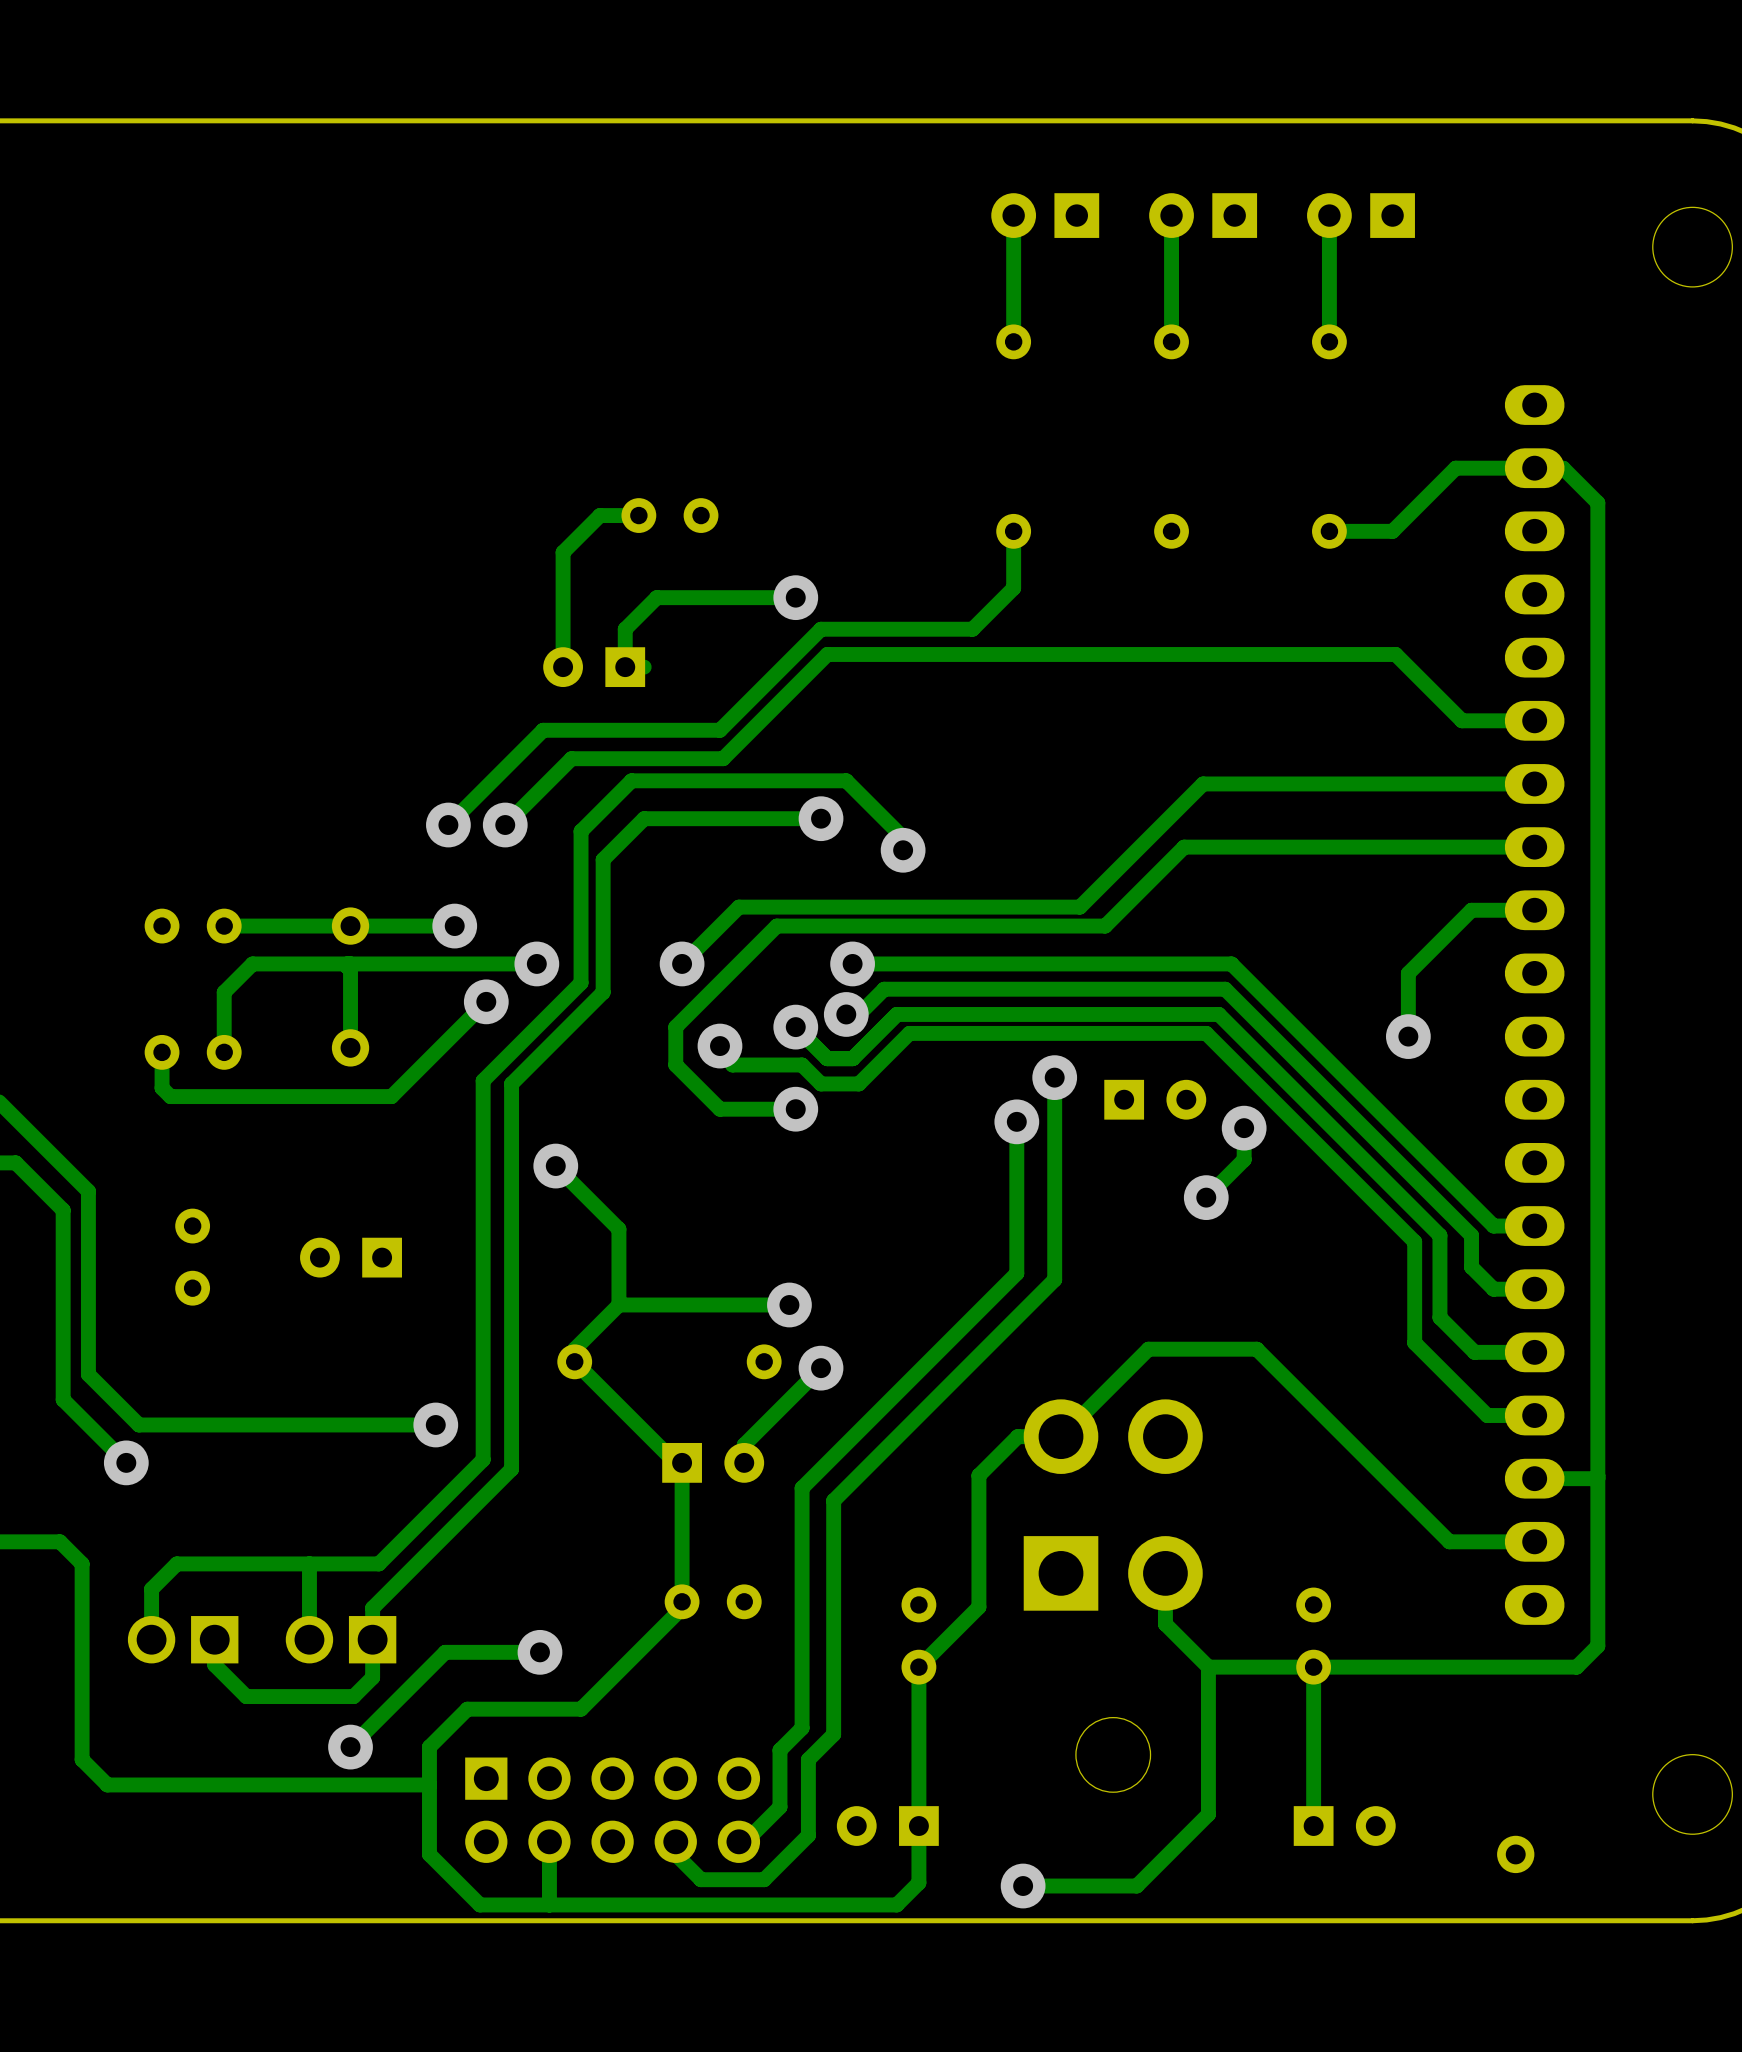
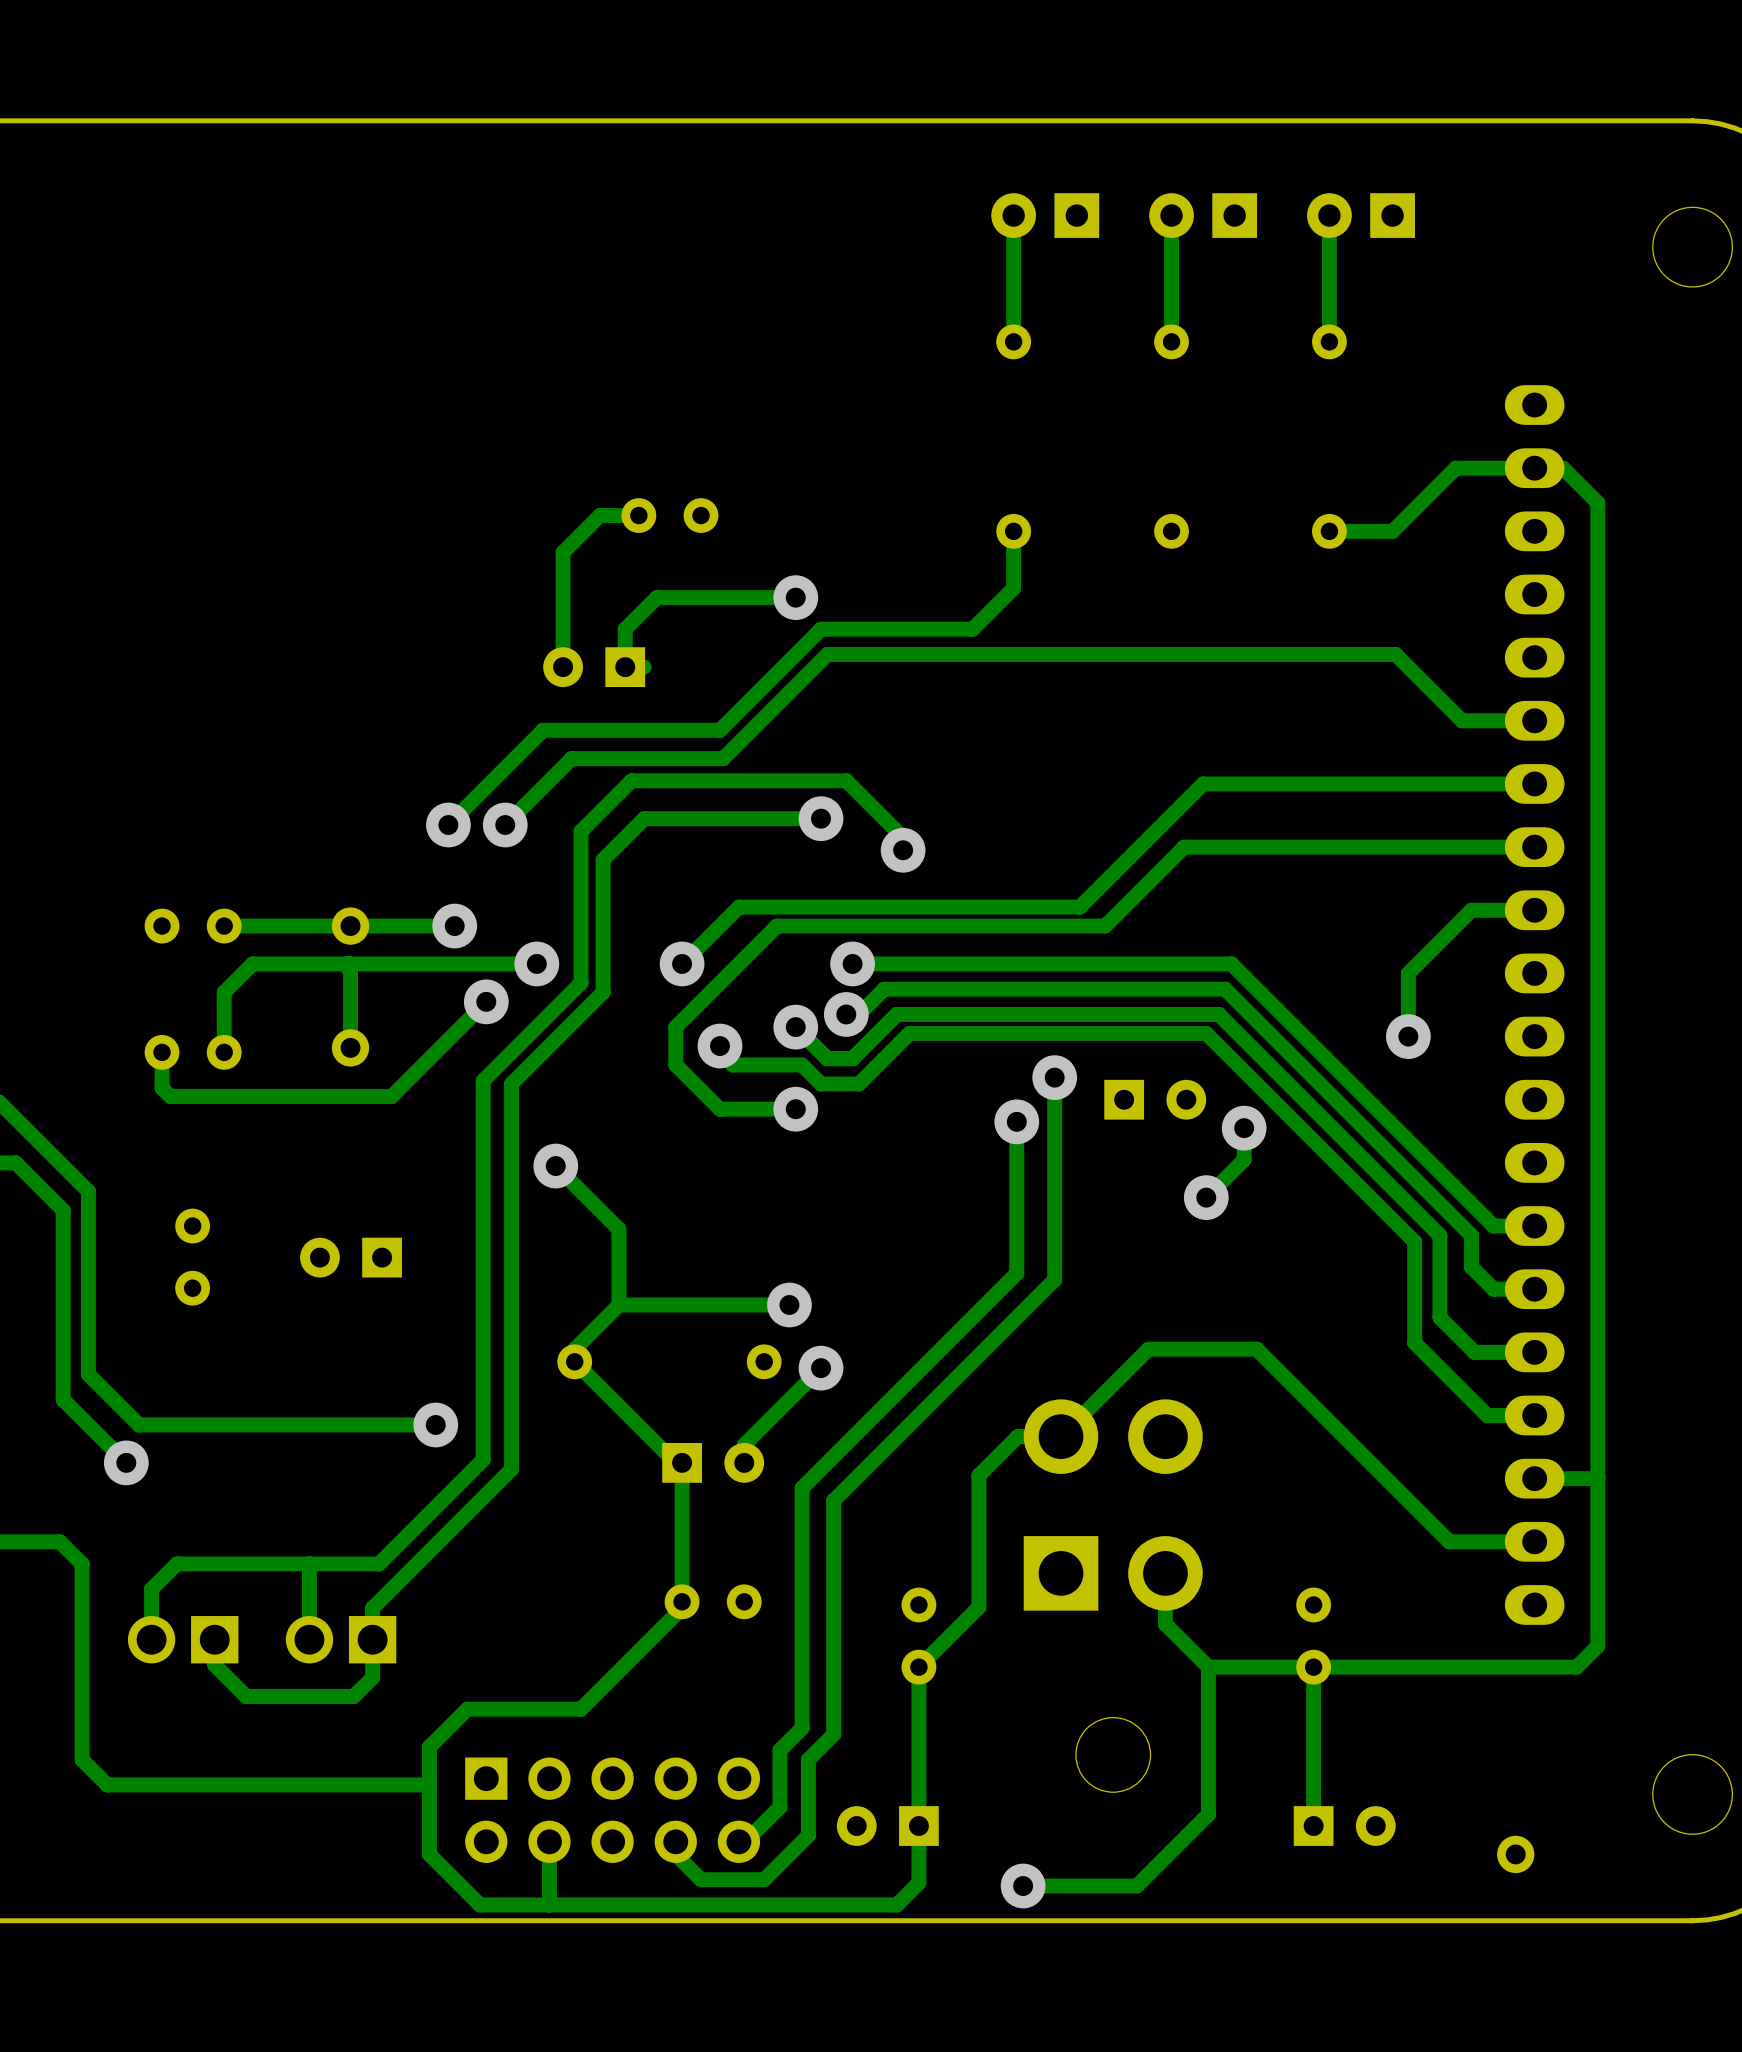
track: (539, 1652) (445, 1652) (350, 1747) -> none
via: (539, 1652) -> none
via: (350, 1747) -> none

